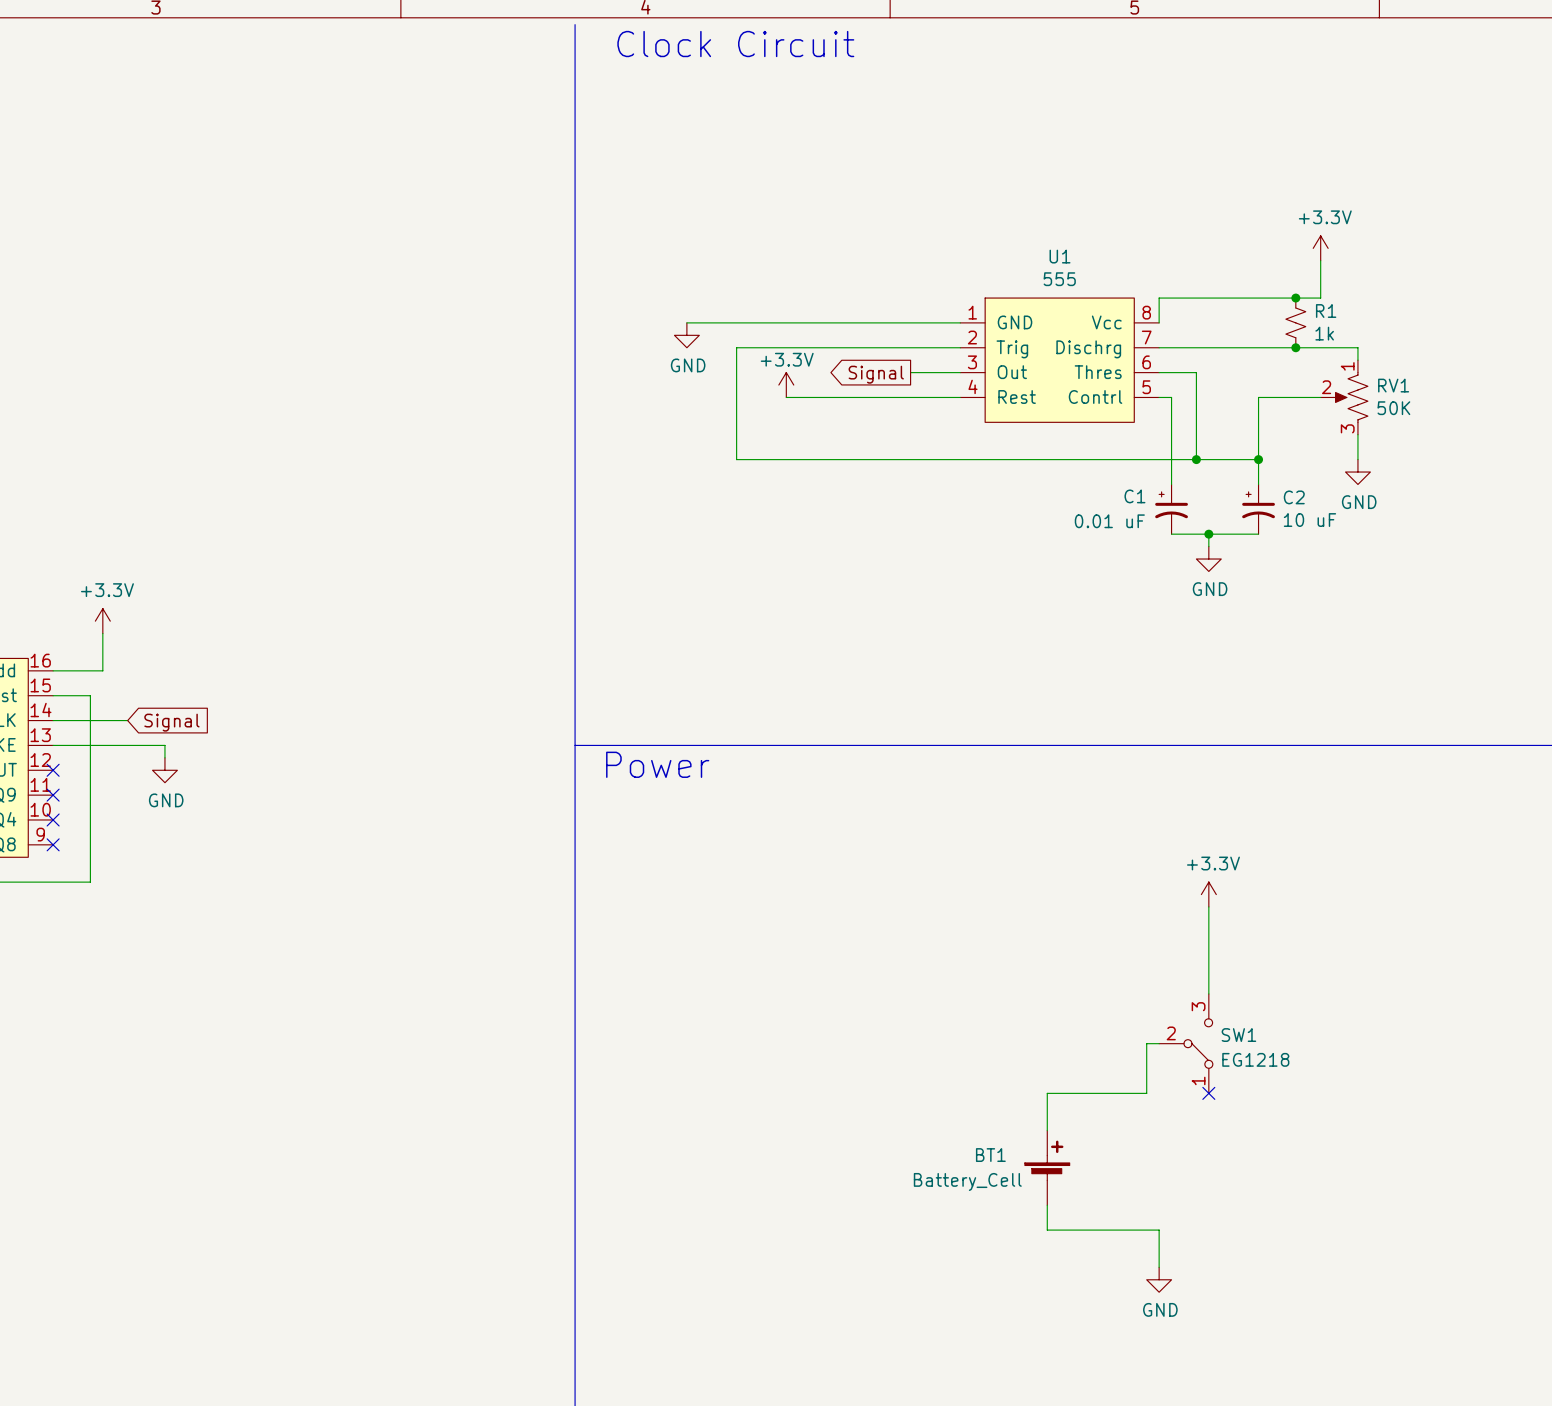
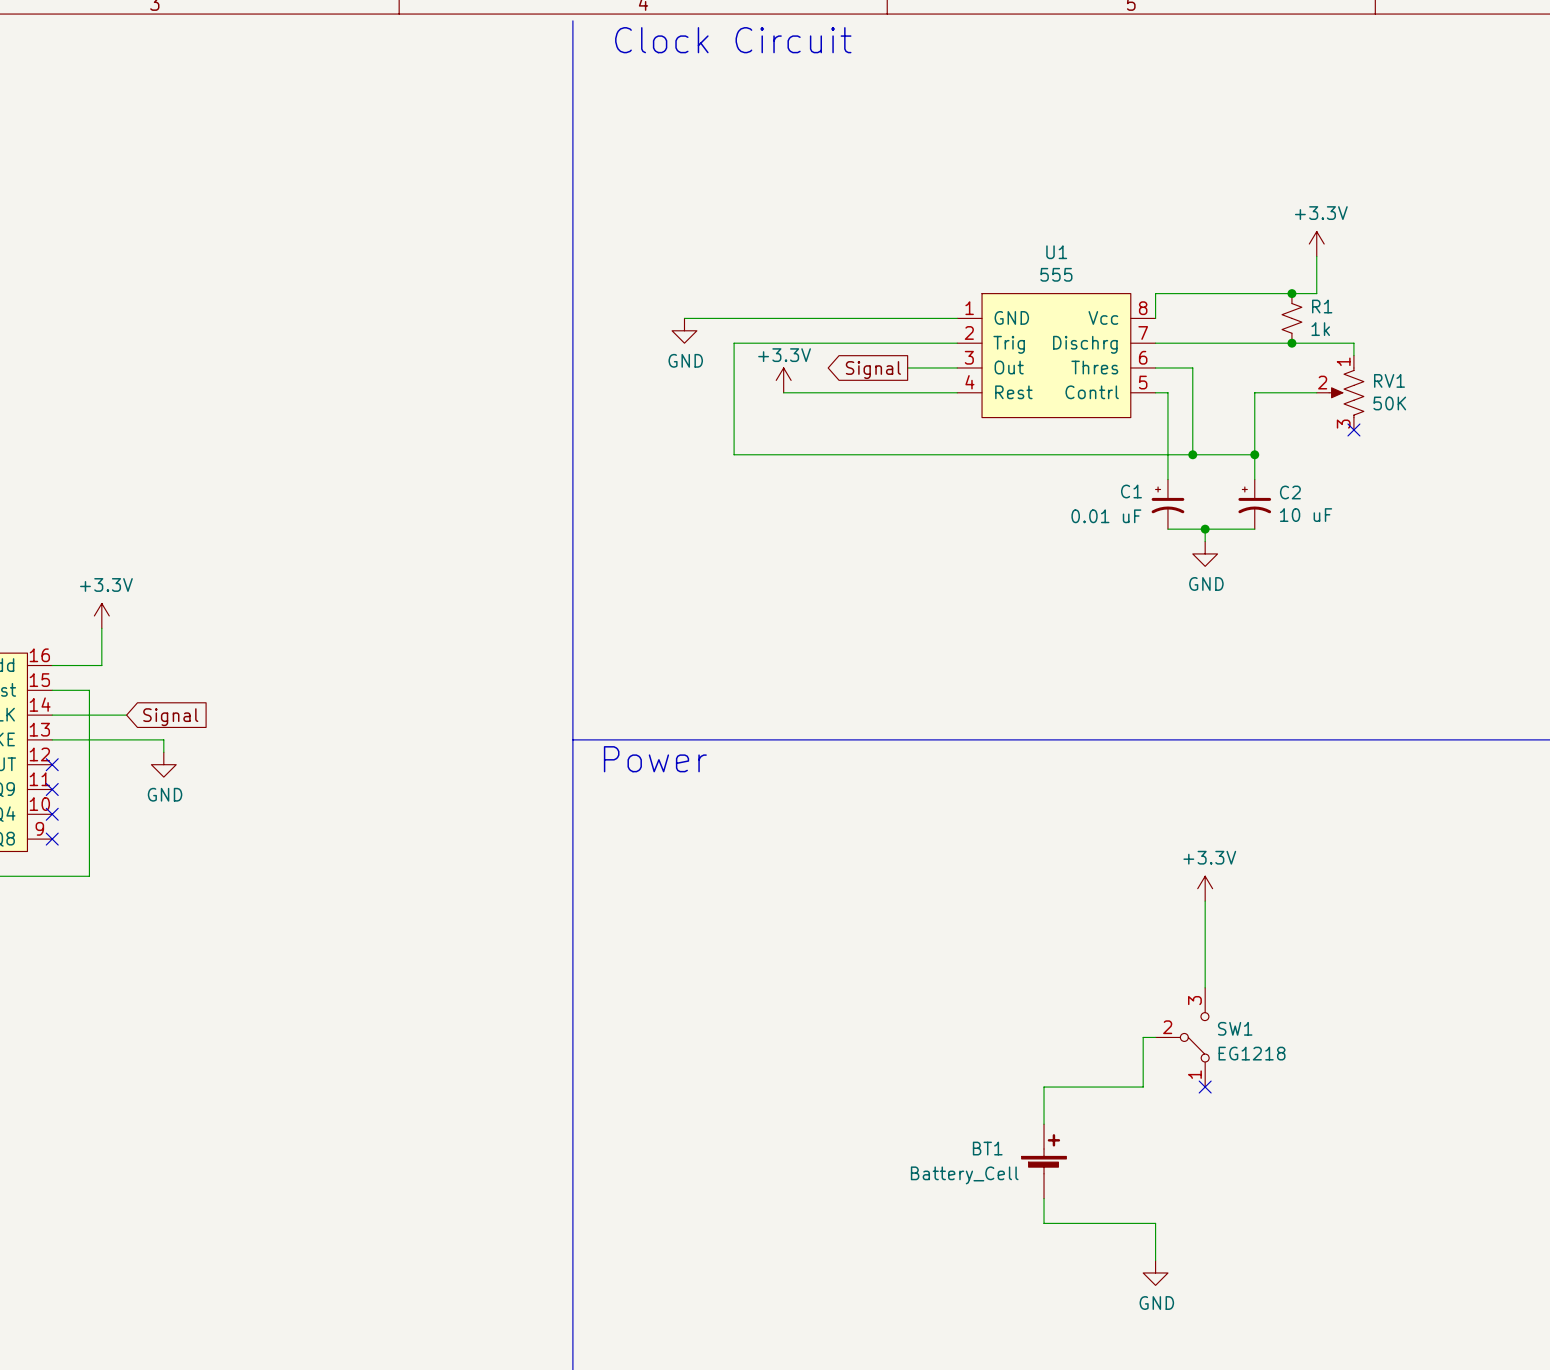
wire: (1357, 434) (1357, 459) -> none
no-connect mark: none -> (1353, 429)
power symbol: GND (1357, 472) -> none

